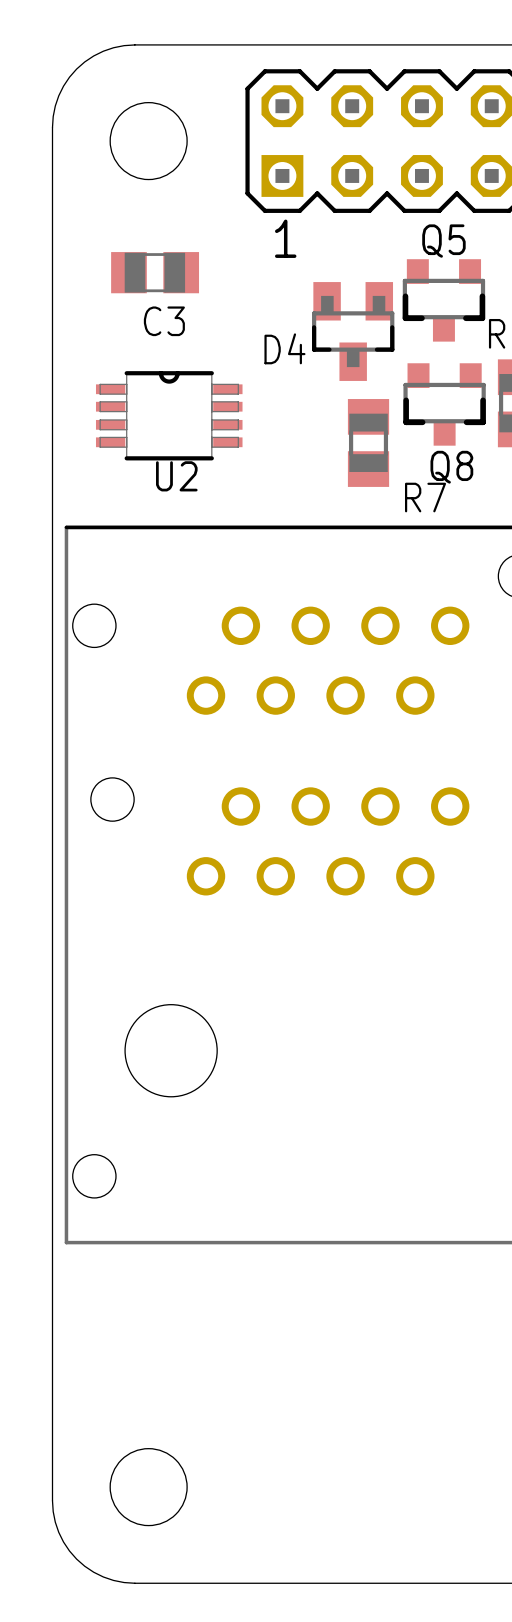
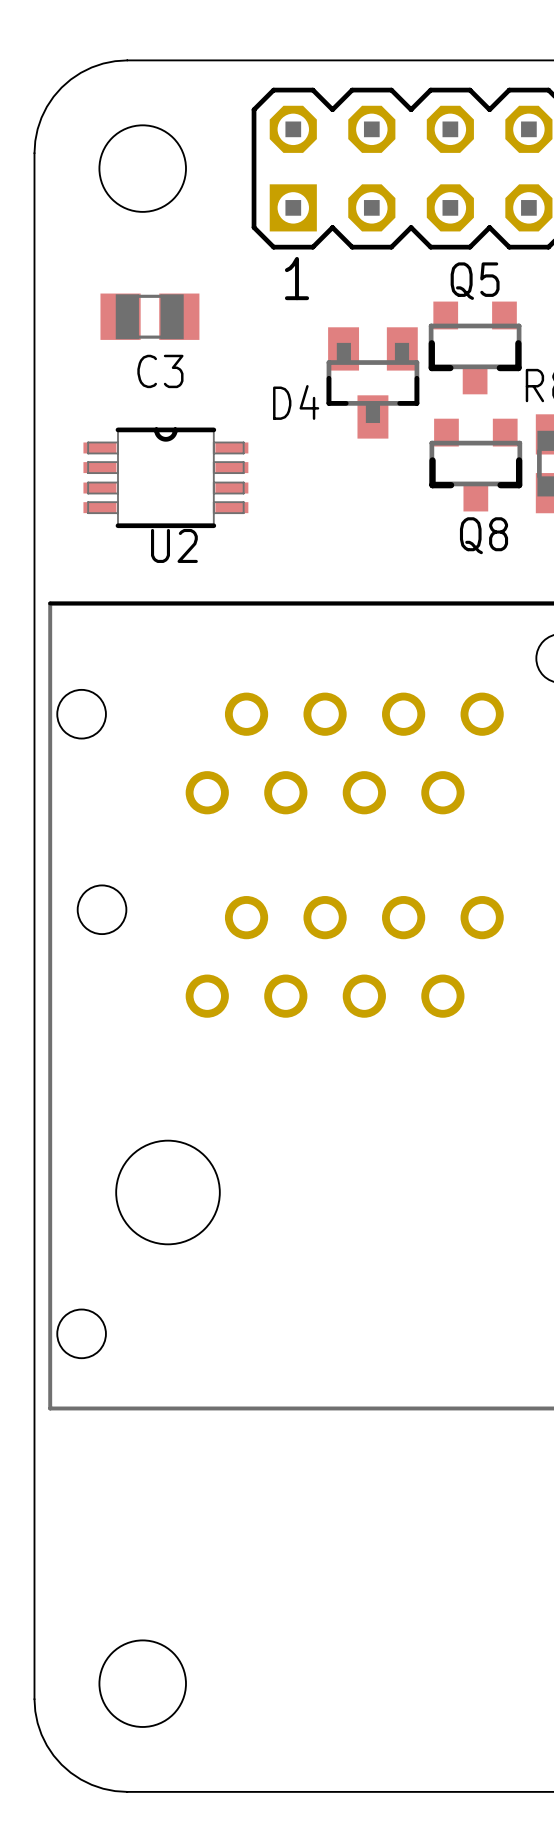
R7: (368, 442) -> none

